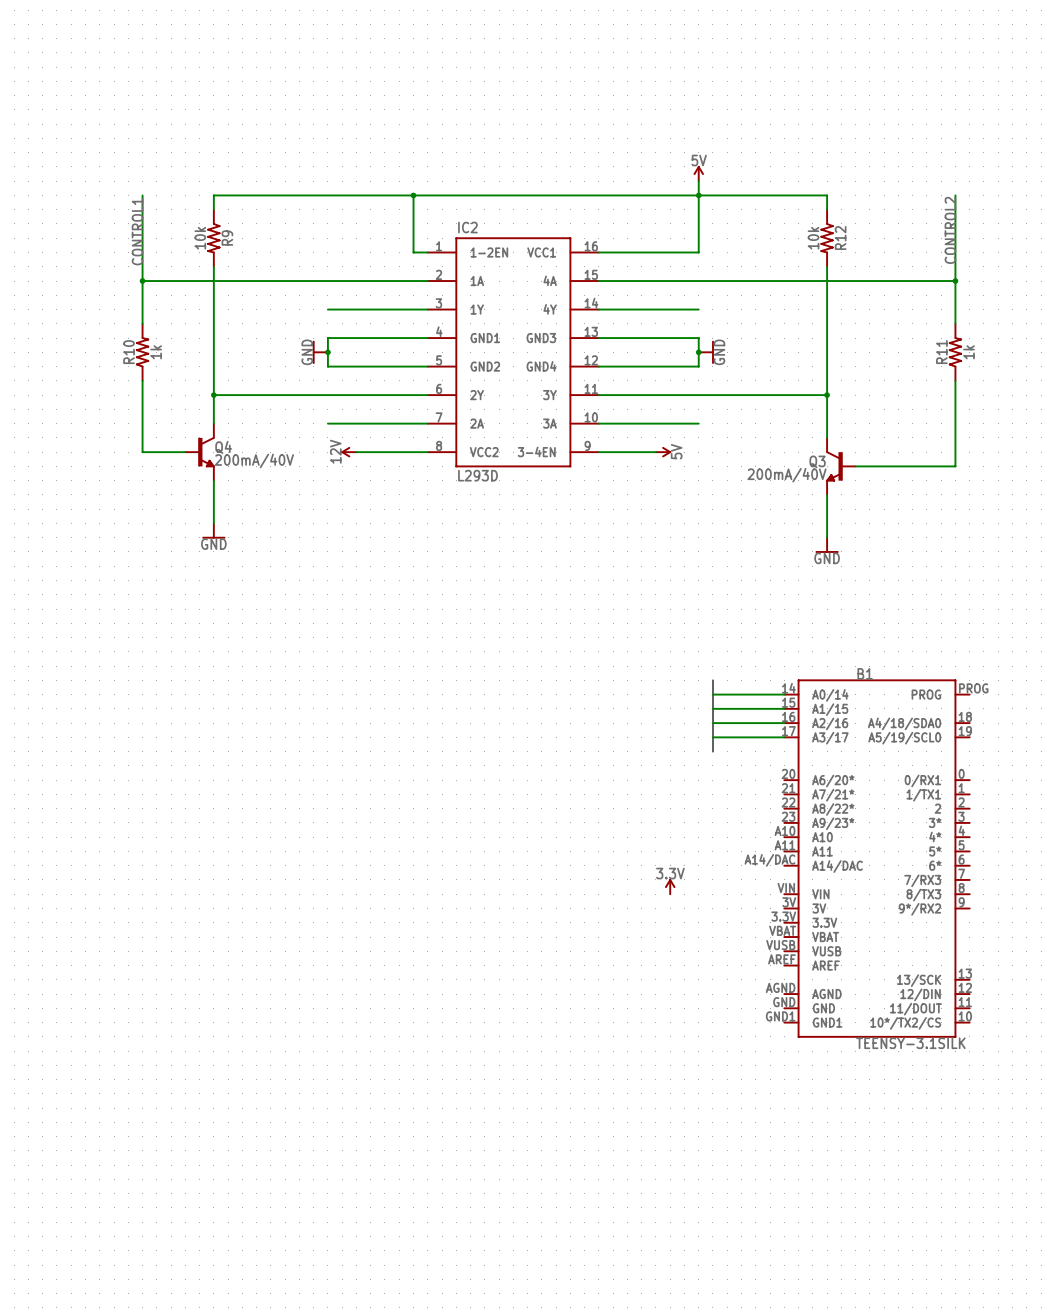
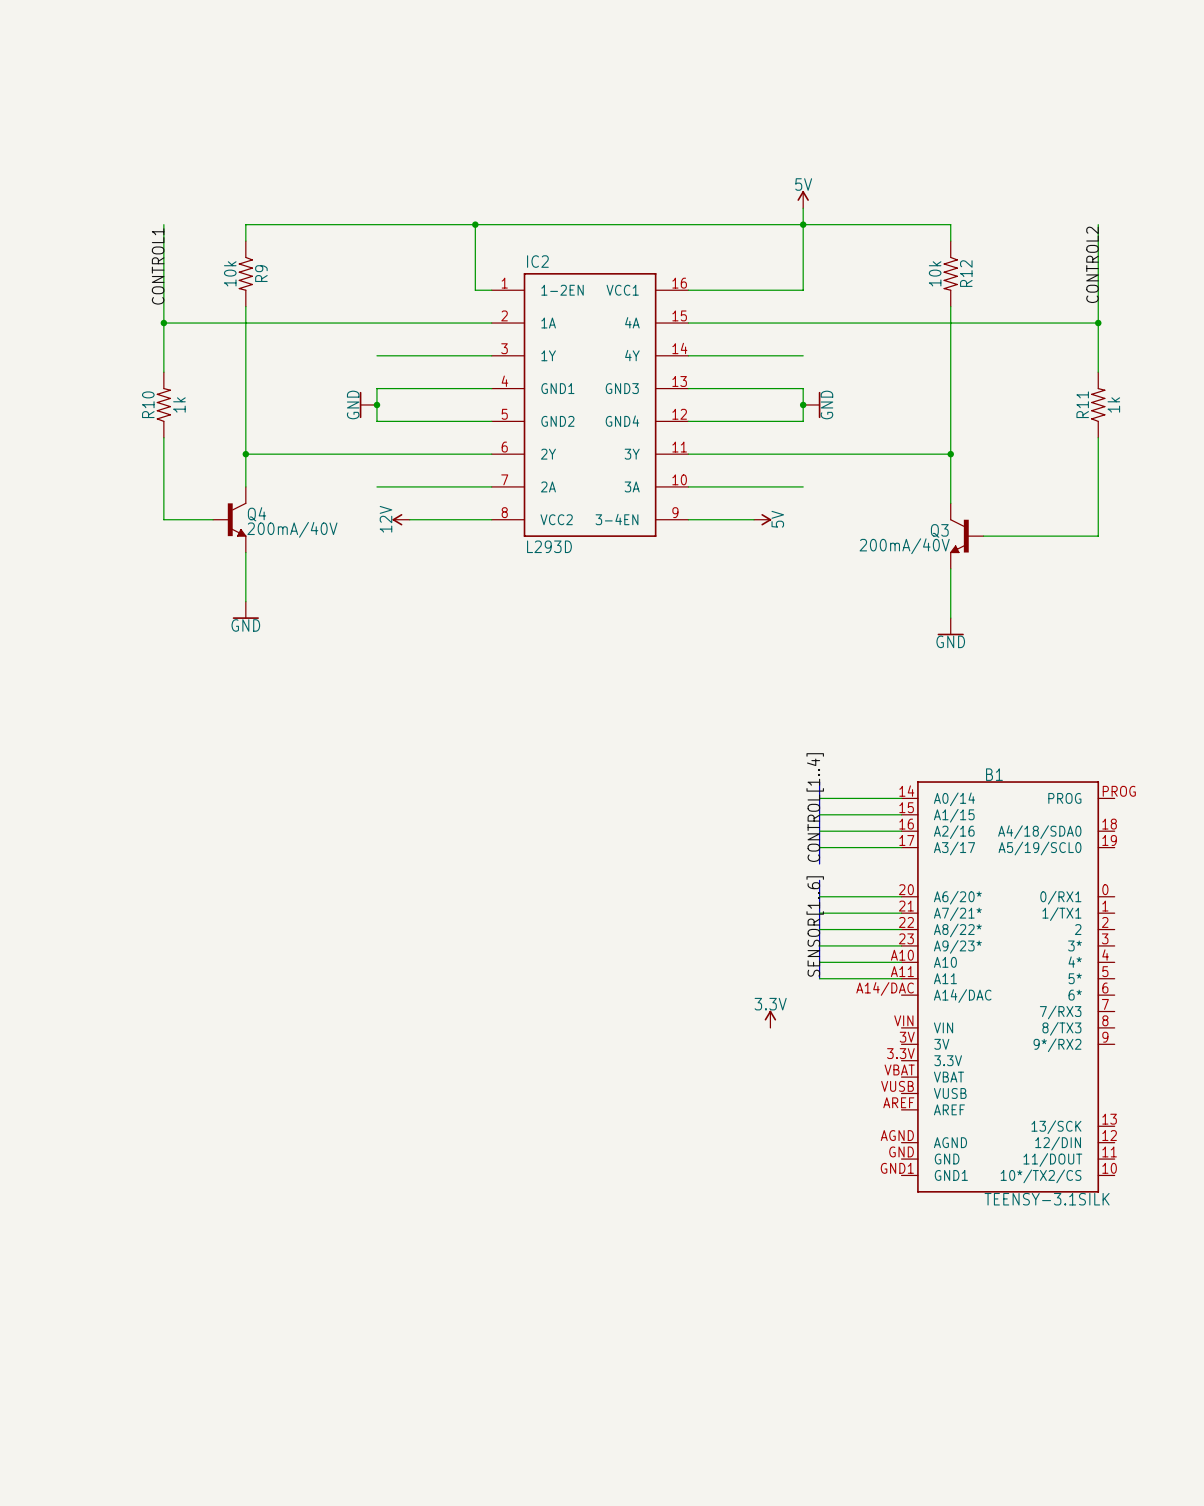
label: none -> CONTROL[1..4] (815, 807)
bus: none -> (819, 880) (819, 978)
wire: none -> (819, 896) (901, 896)
wire: none -> (819, 913) (901, 913)
label: none -> SENSOR[1..6] (815, 926)
wire: none -> (819, 929) (901, 929)
wire: none -> (819, 945) (901, 945)
wire: none -> (819, 962) (901, 962)
wire: none -> (819, 978) (901, 978)

